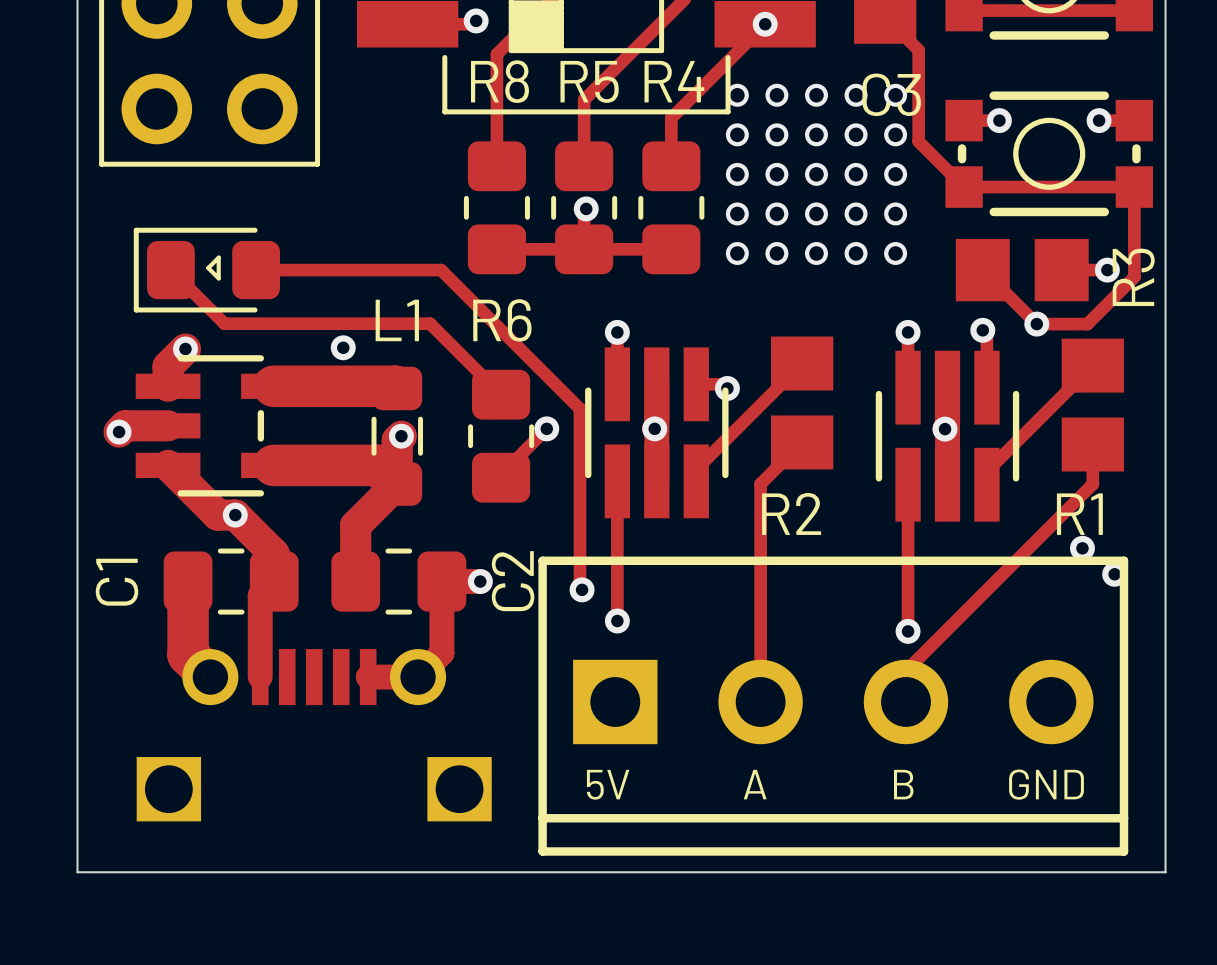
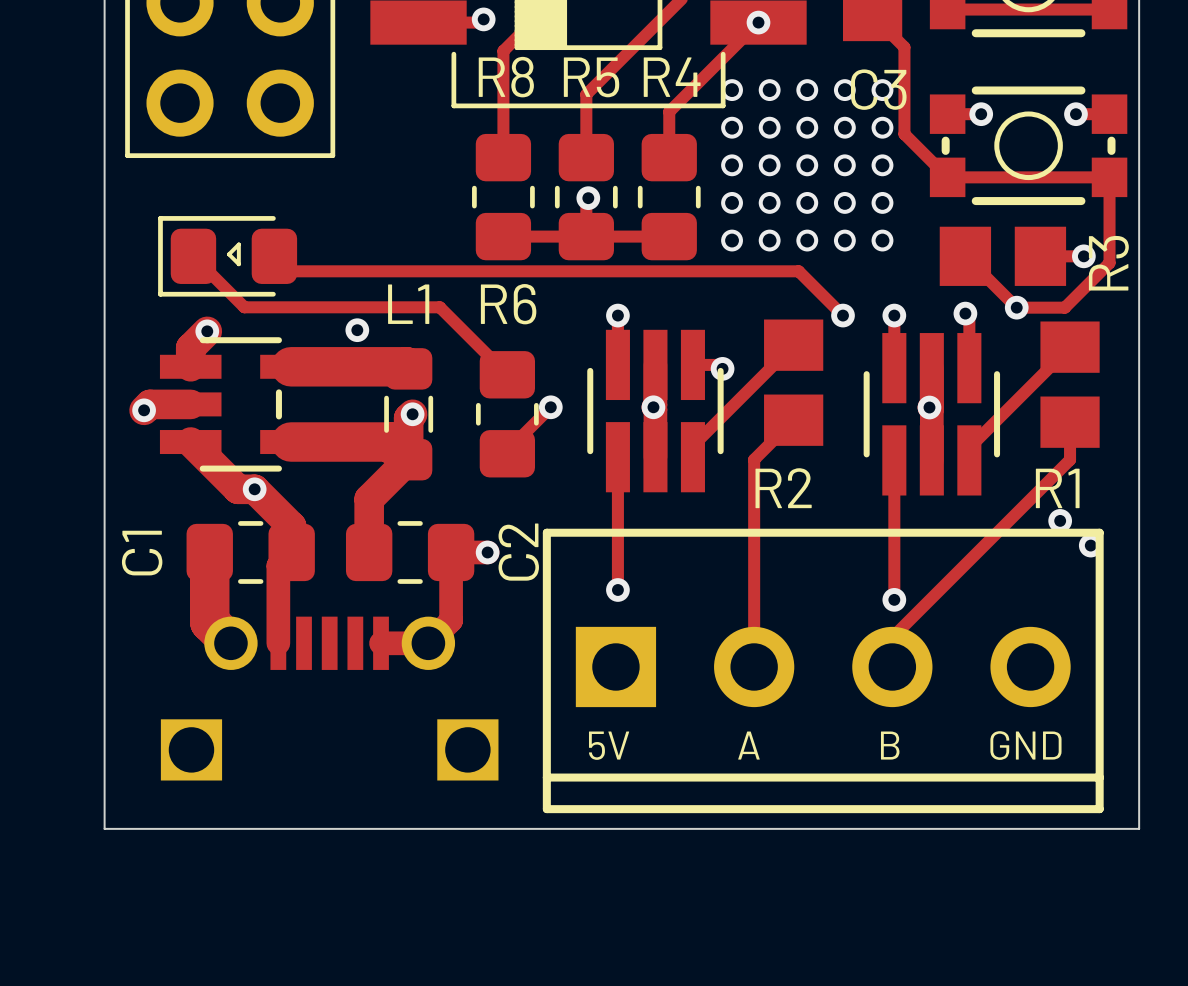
track: (256, 270) (441, 270) (579, 408) (579, 592) -> none
track: none -> (289, 271) (798, 271) (843, 315)
via: none -> (843, 315)
via: (582, 589) -> none

